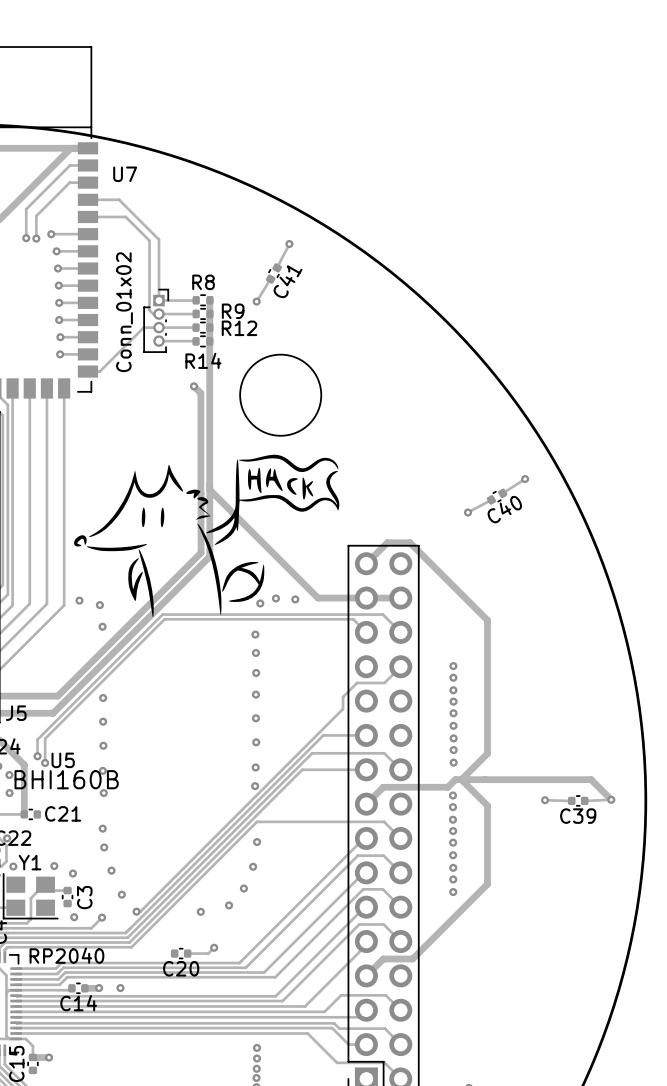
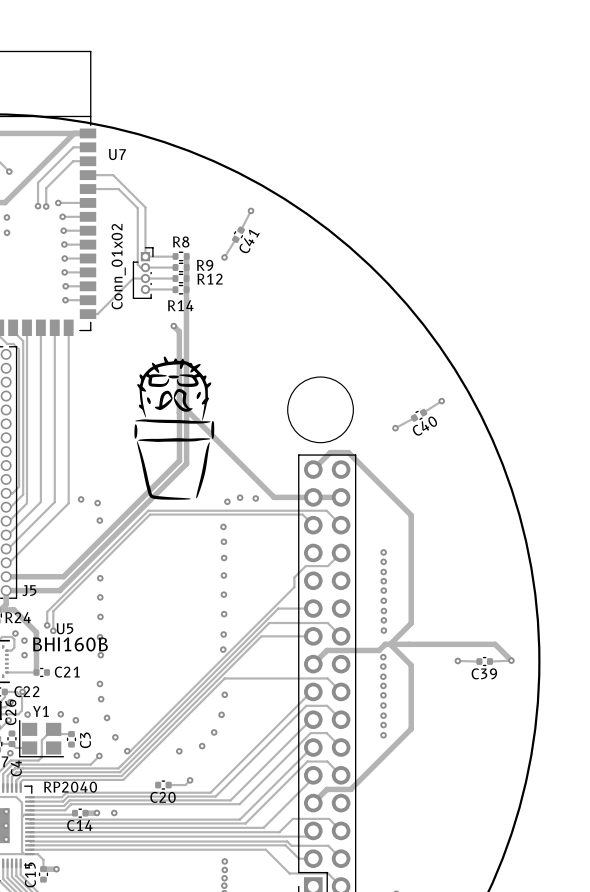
round board edge position: (280, 395) -> (320, 409)
drawing: none -> [134, 356, 215, 500]
drawing: [74, 454, 340, 618] -> none

